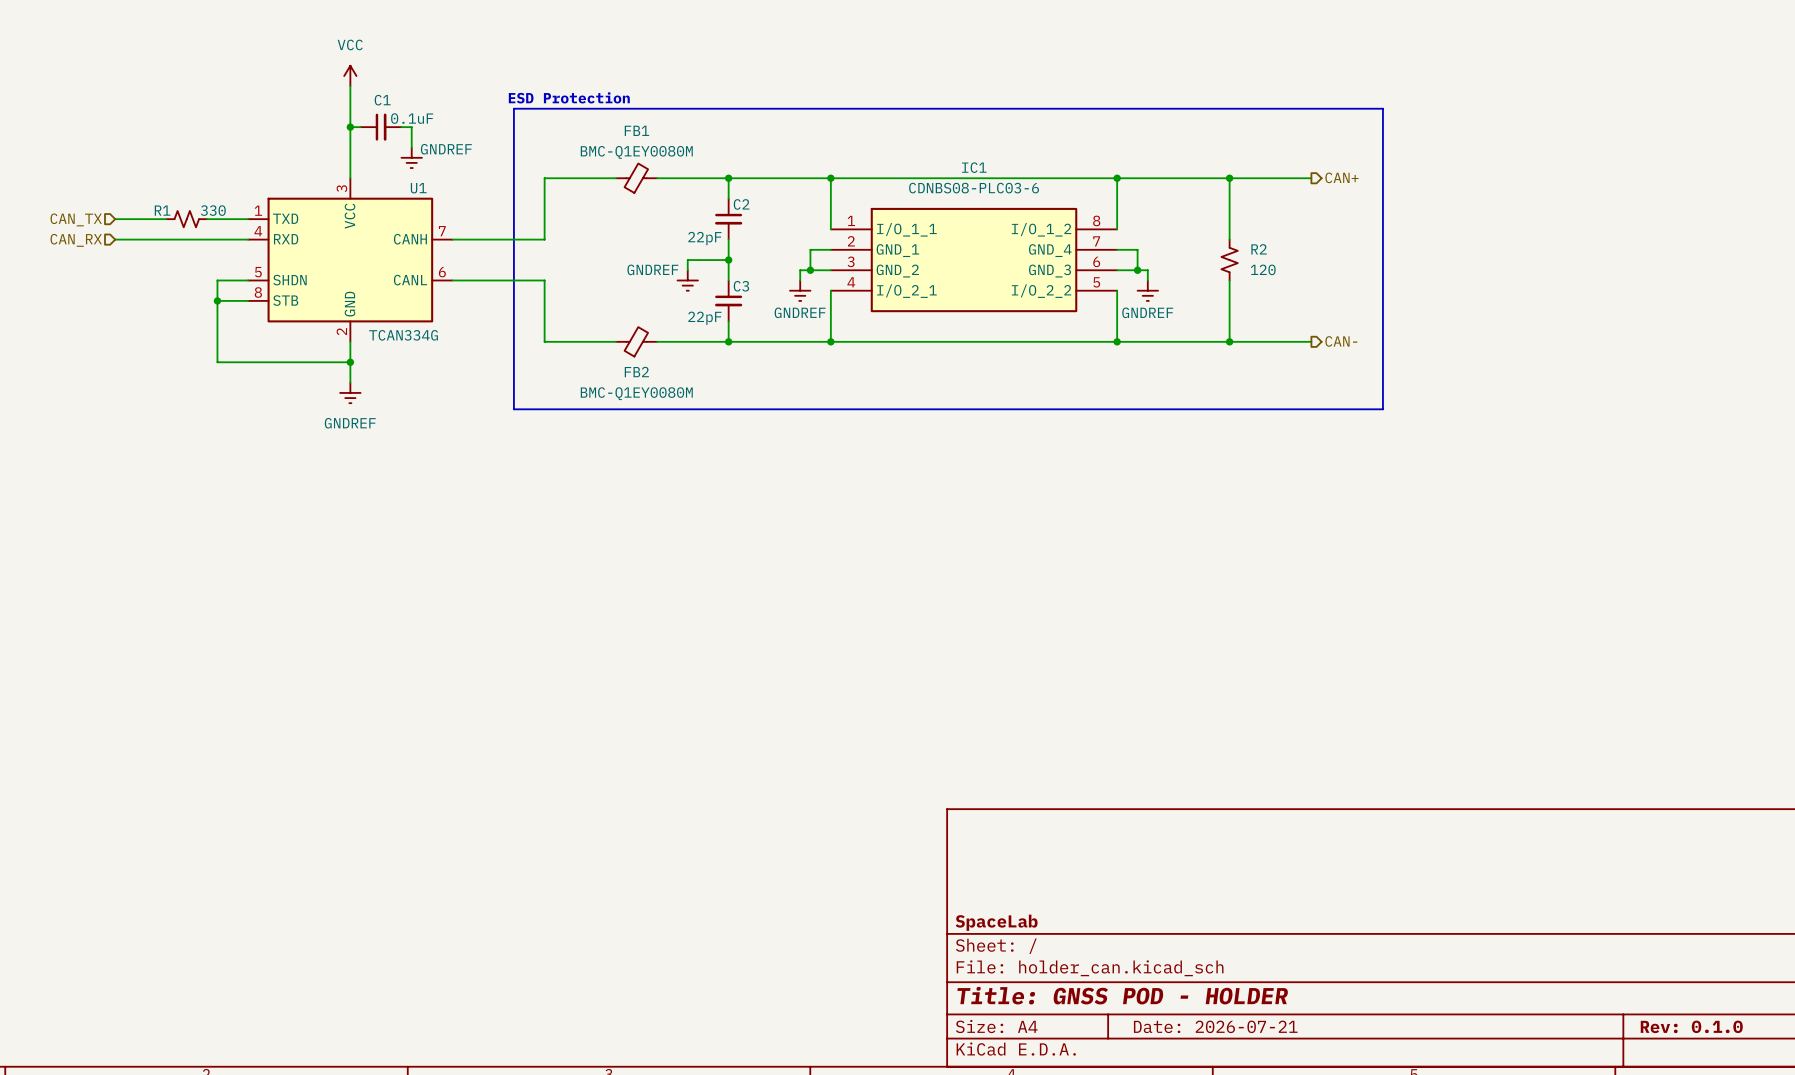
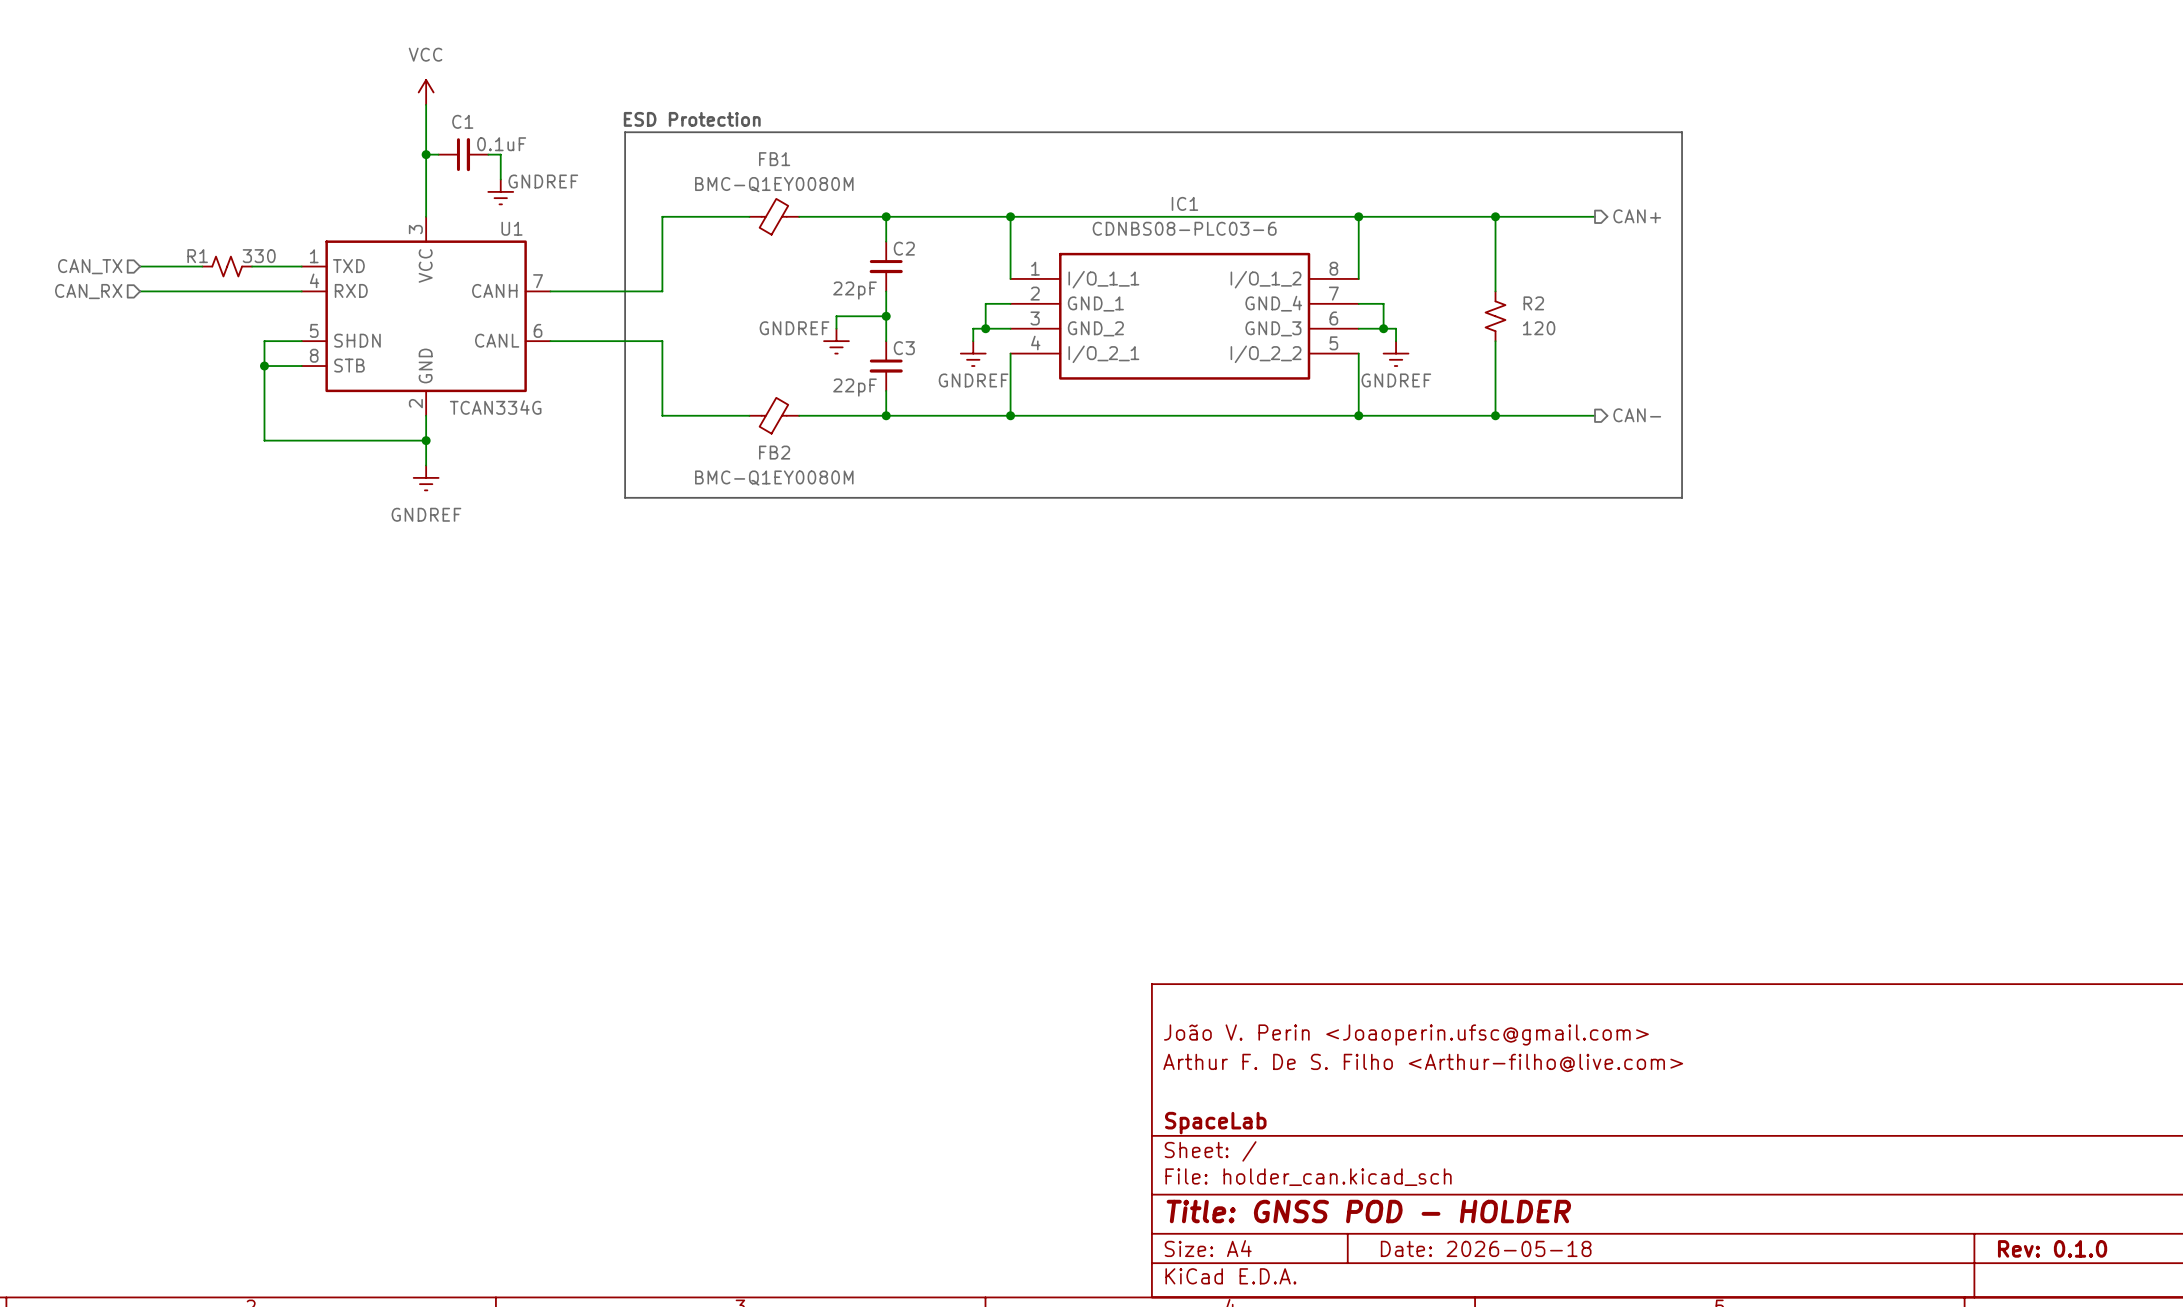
title block: none -> João V. Perin <Joaoperin.ufsc@gmail.com> (1406, 1034)
title block: none -> Arthur F. De S. Filho <Arthur-filho@live.com> (1423, 1062)
title block: Date: 2026-07-21 (1215, 1026) -> Date: 2026-05-18 (1486, 1248)

